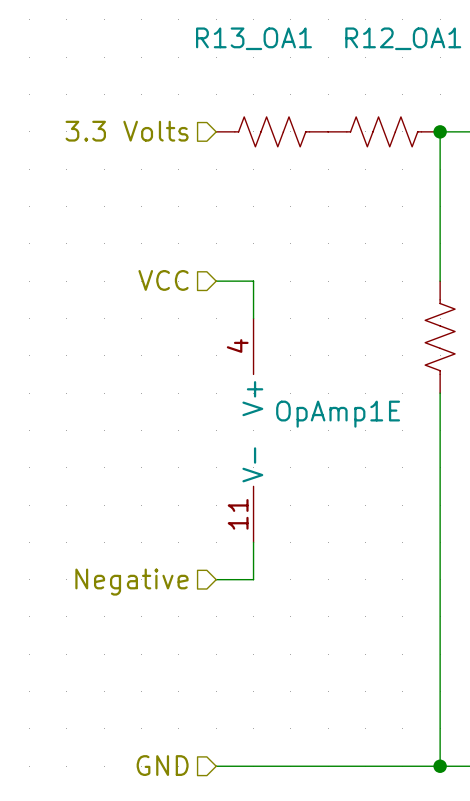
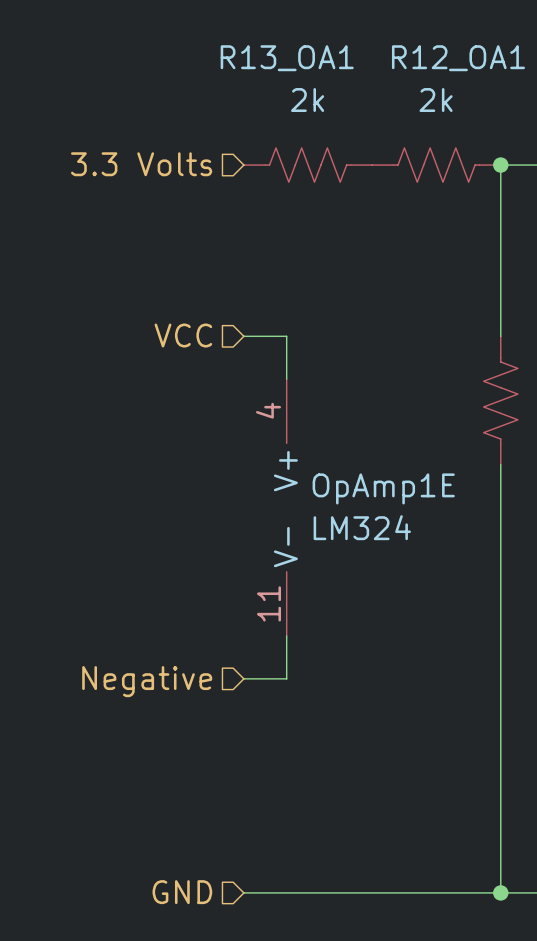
R13_OA1 value: none -> 2k (307, 100)
R12_OA1 value: none -> 2k (436, 100)
OpAmp1E value: none -> LM324 (362, 527)

